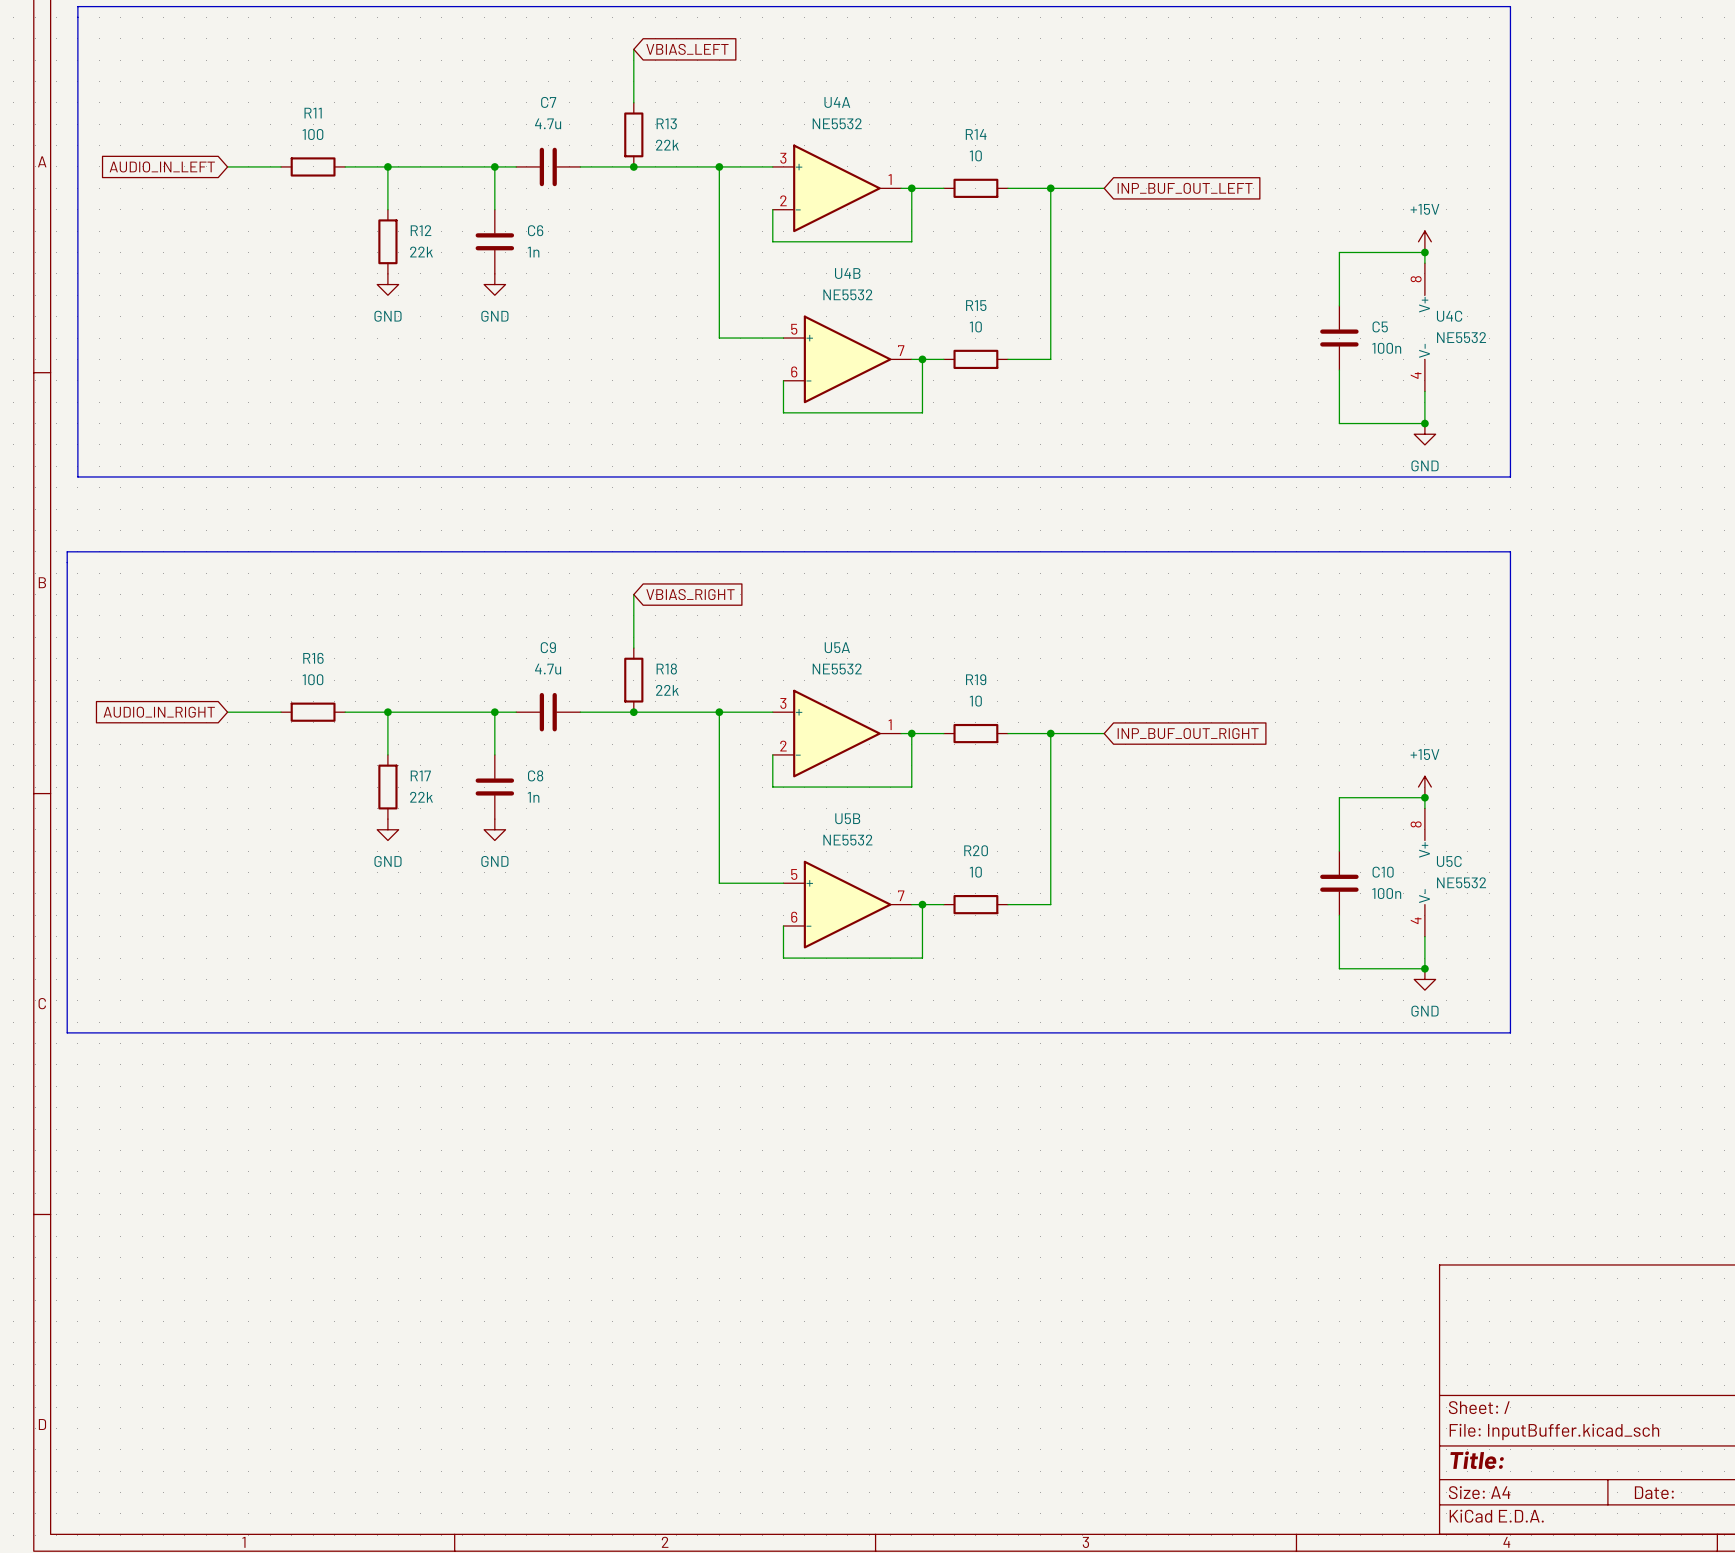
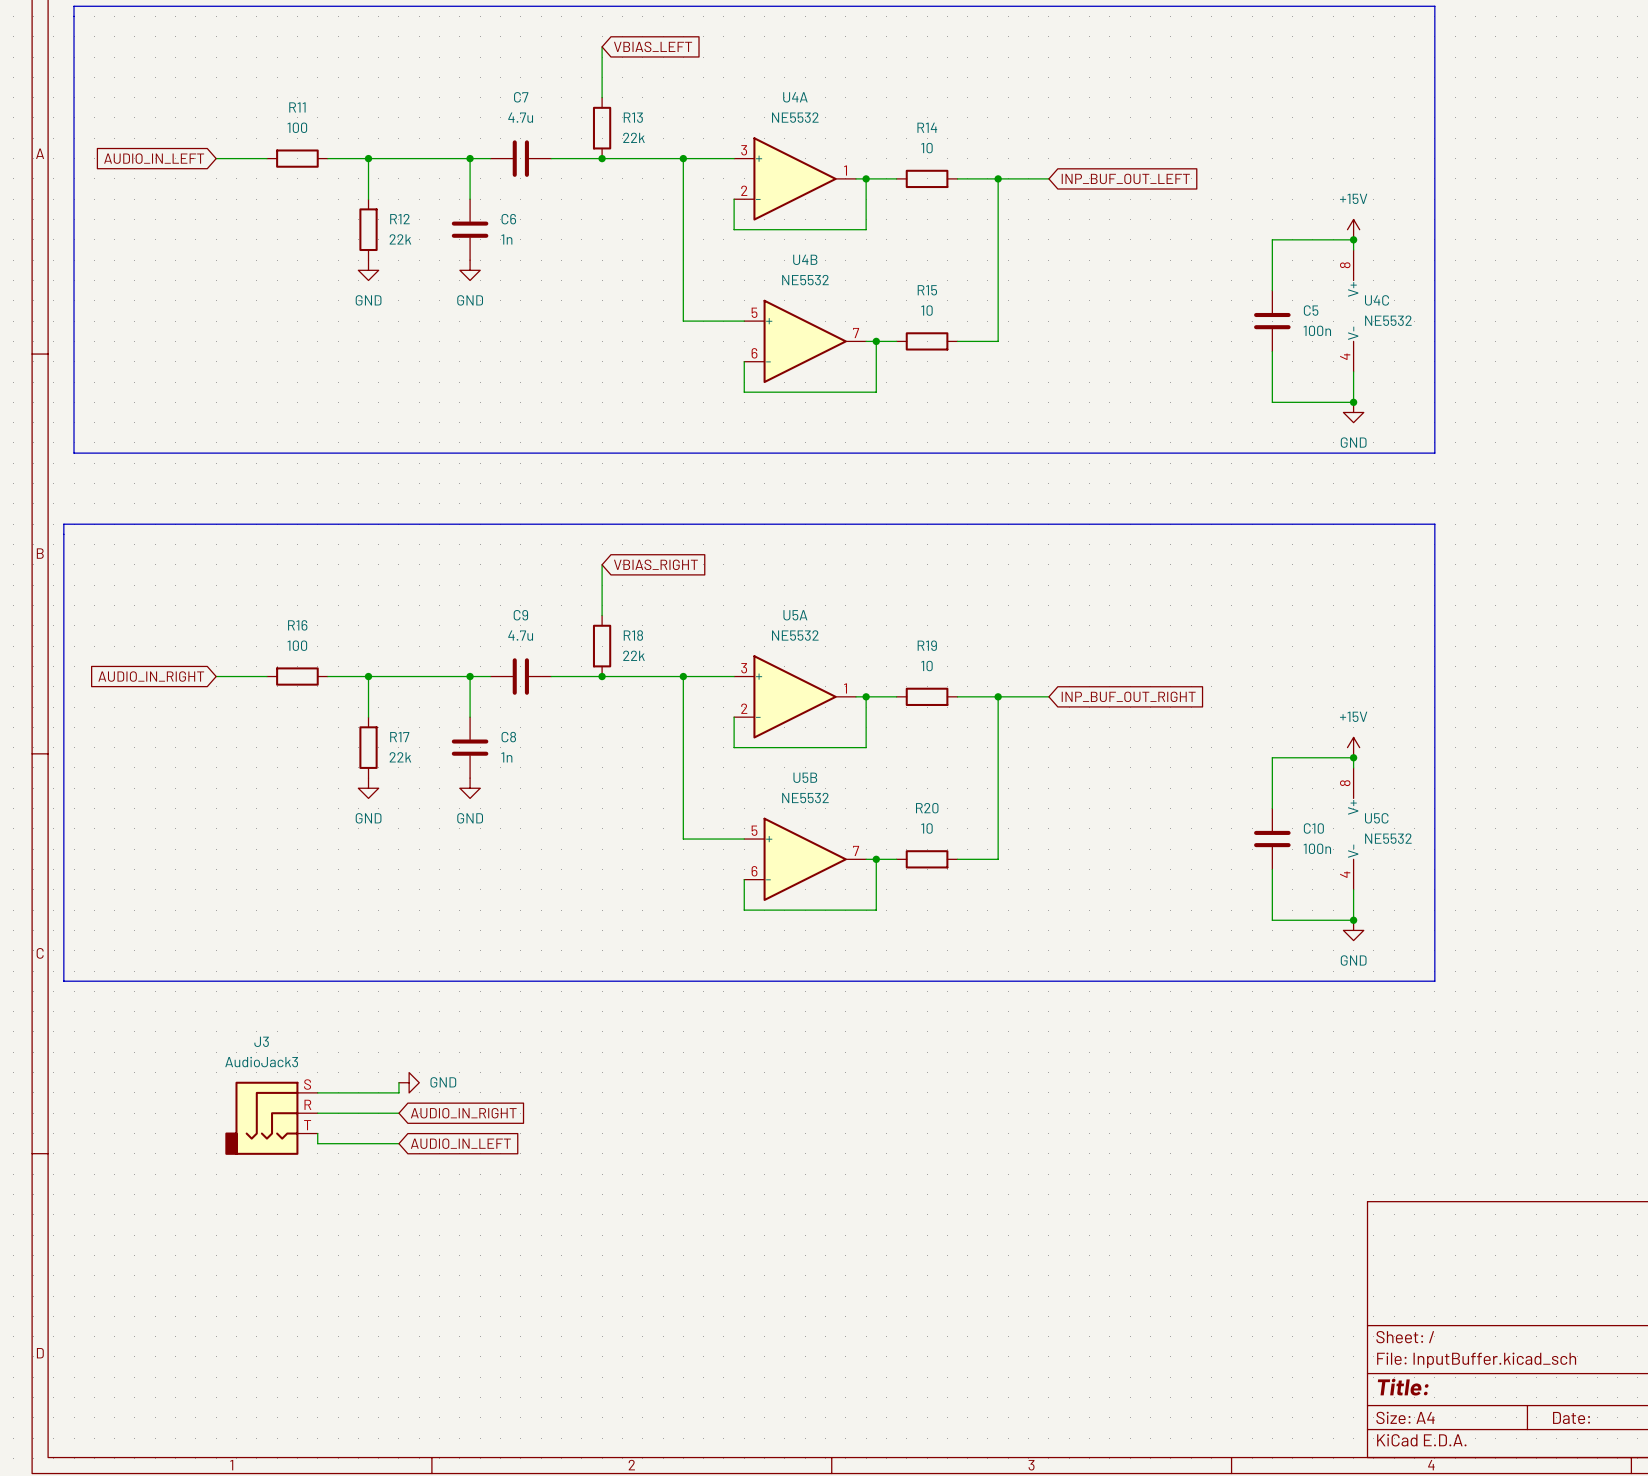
wire: none -> (398, 1082) (398, 1092) (317, 1092)
power symbol: none -> GND (409, 1082)
wire: none -> (317, 1113) (398, 1113)
global label: none -> AUDIO_IN_RIGHT (463, 1113)
J3: none -> AudioJack3 (271, 1118)
wire: none -> (317, 1133) (317, 1143) (398, 1143)
global label: none -> AUDIO_IN_LEFT (460, 1143)

